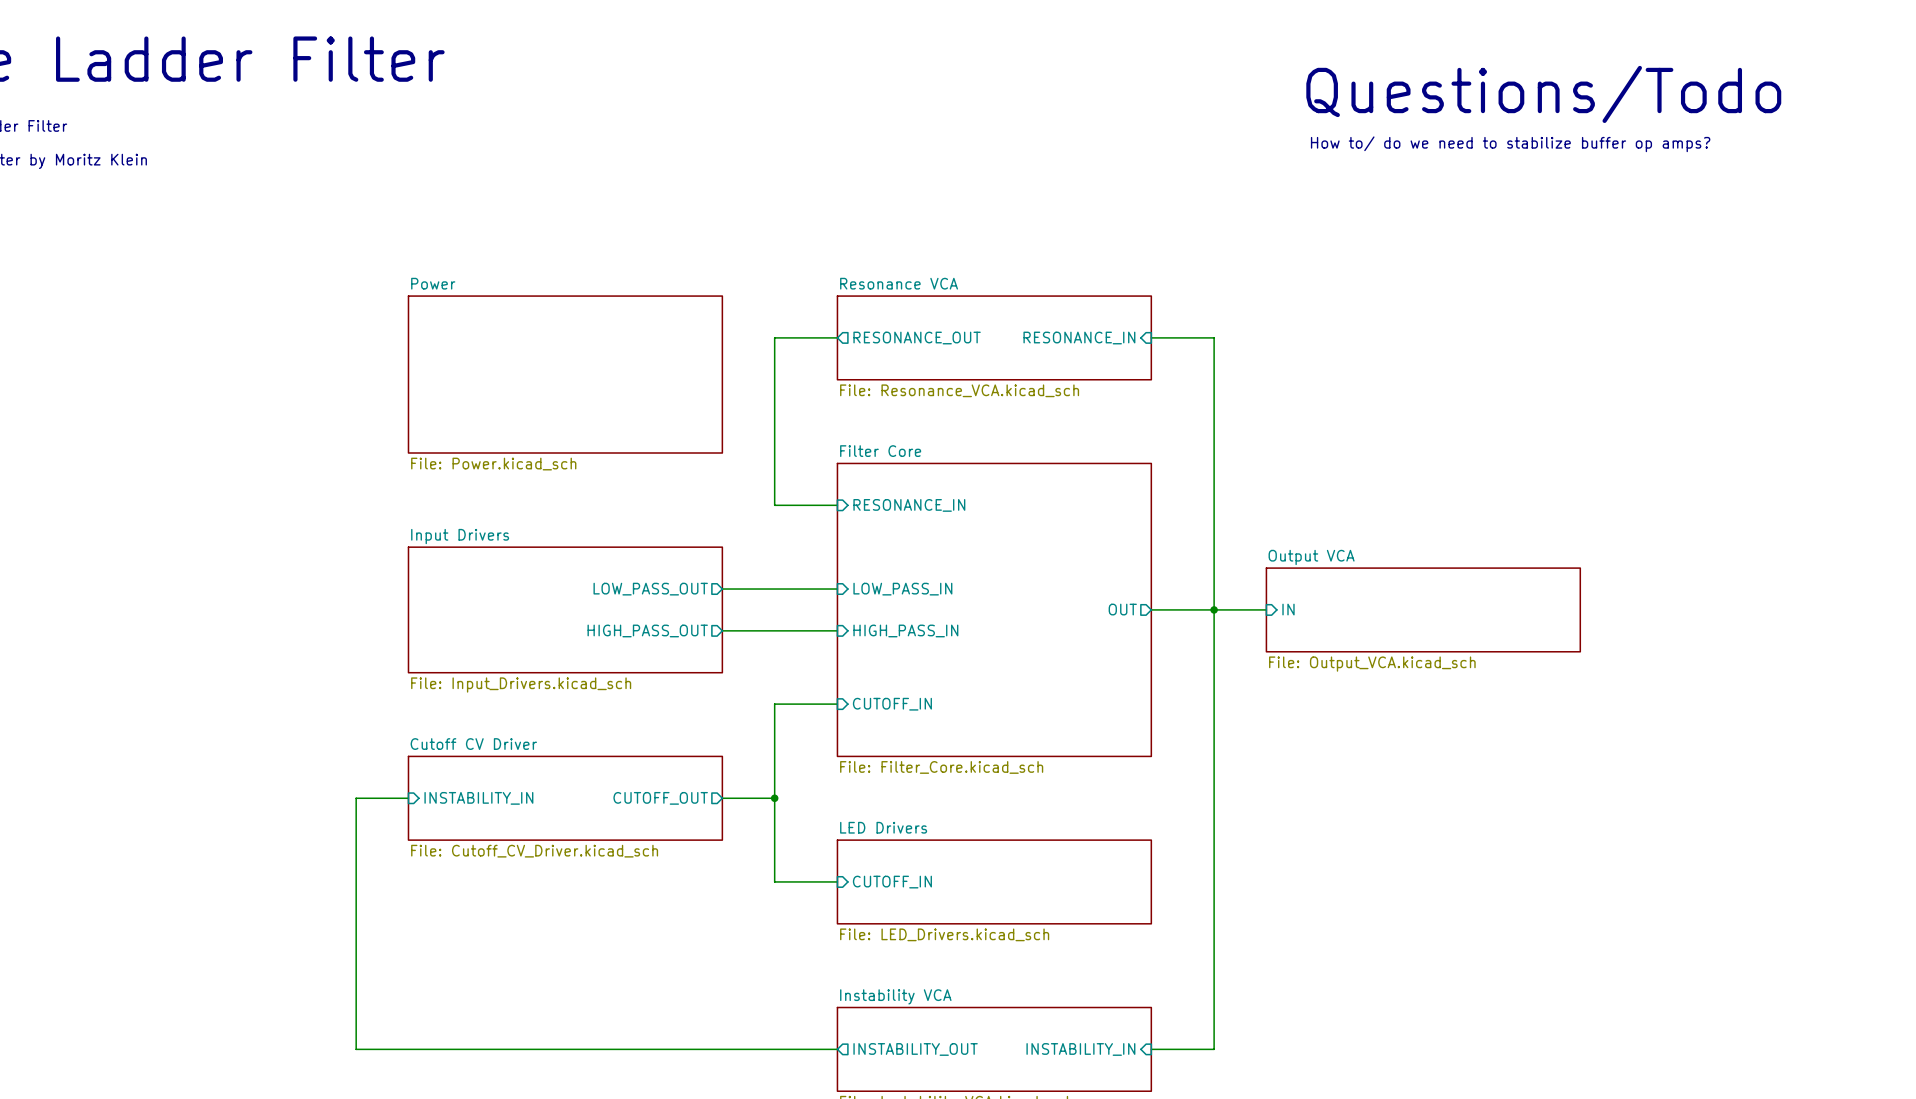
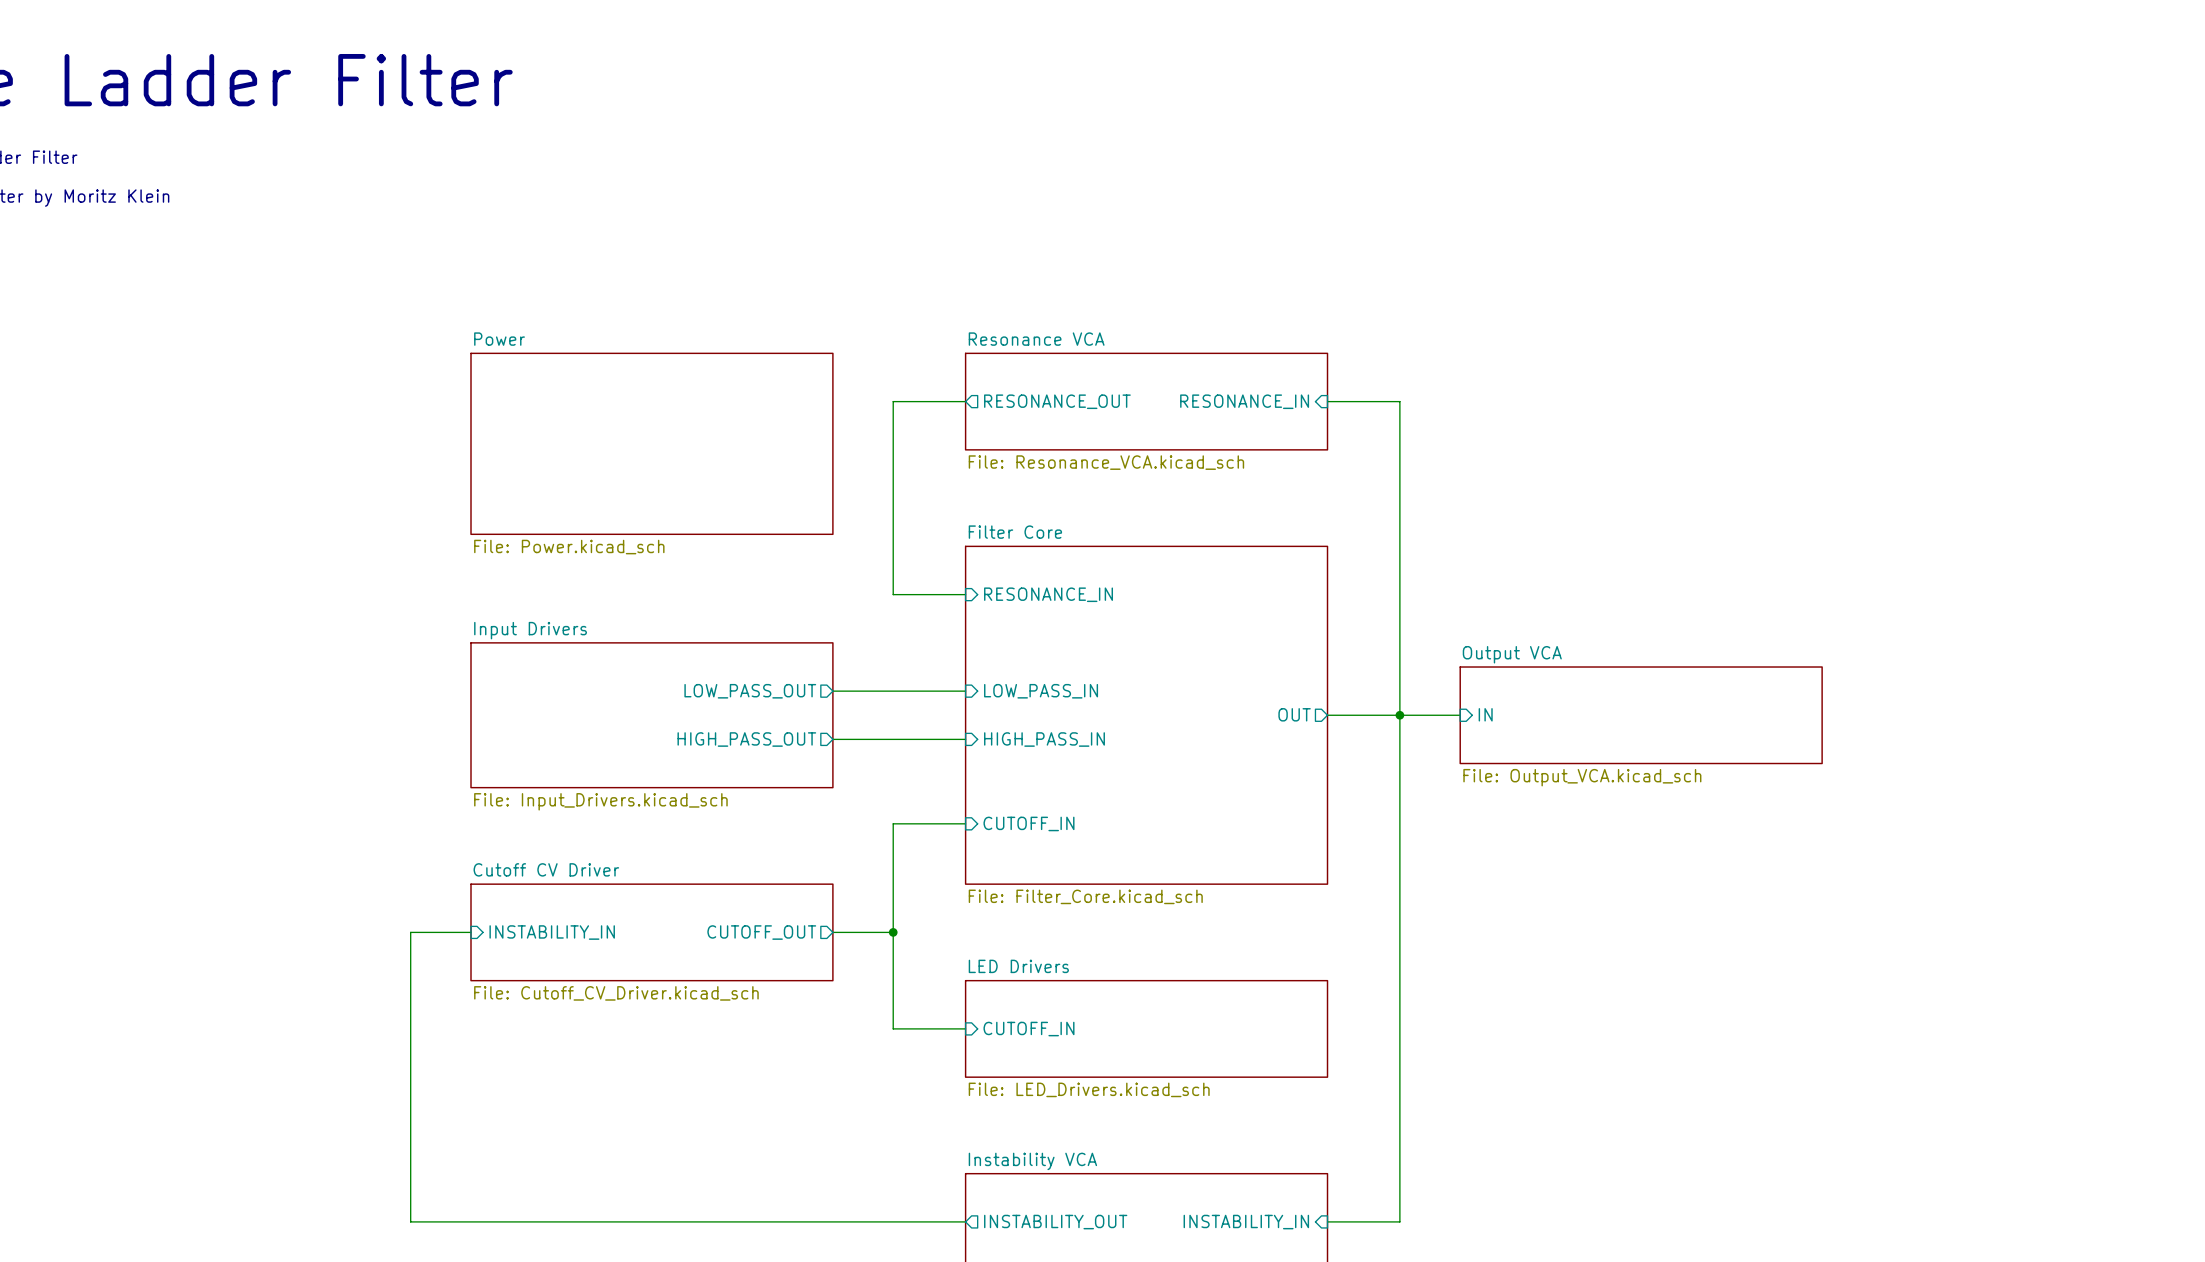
text: Questions/Todo (1543, 94) -> none
text: How to/ do we need to stabilize buffer op amps? (1510, 144) -> none

